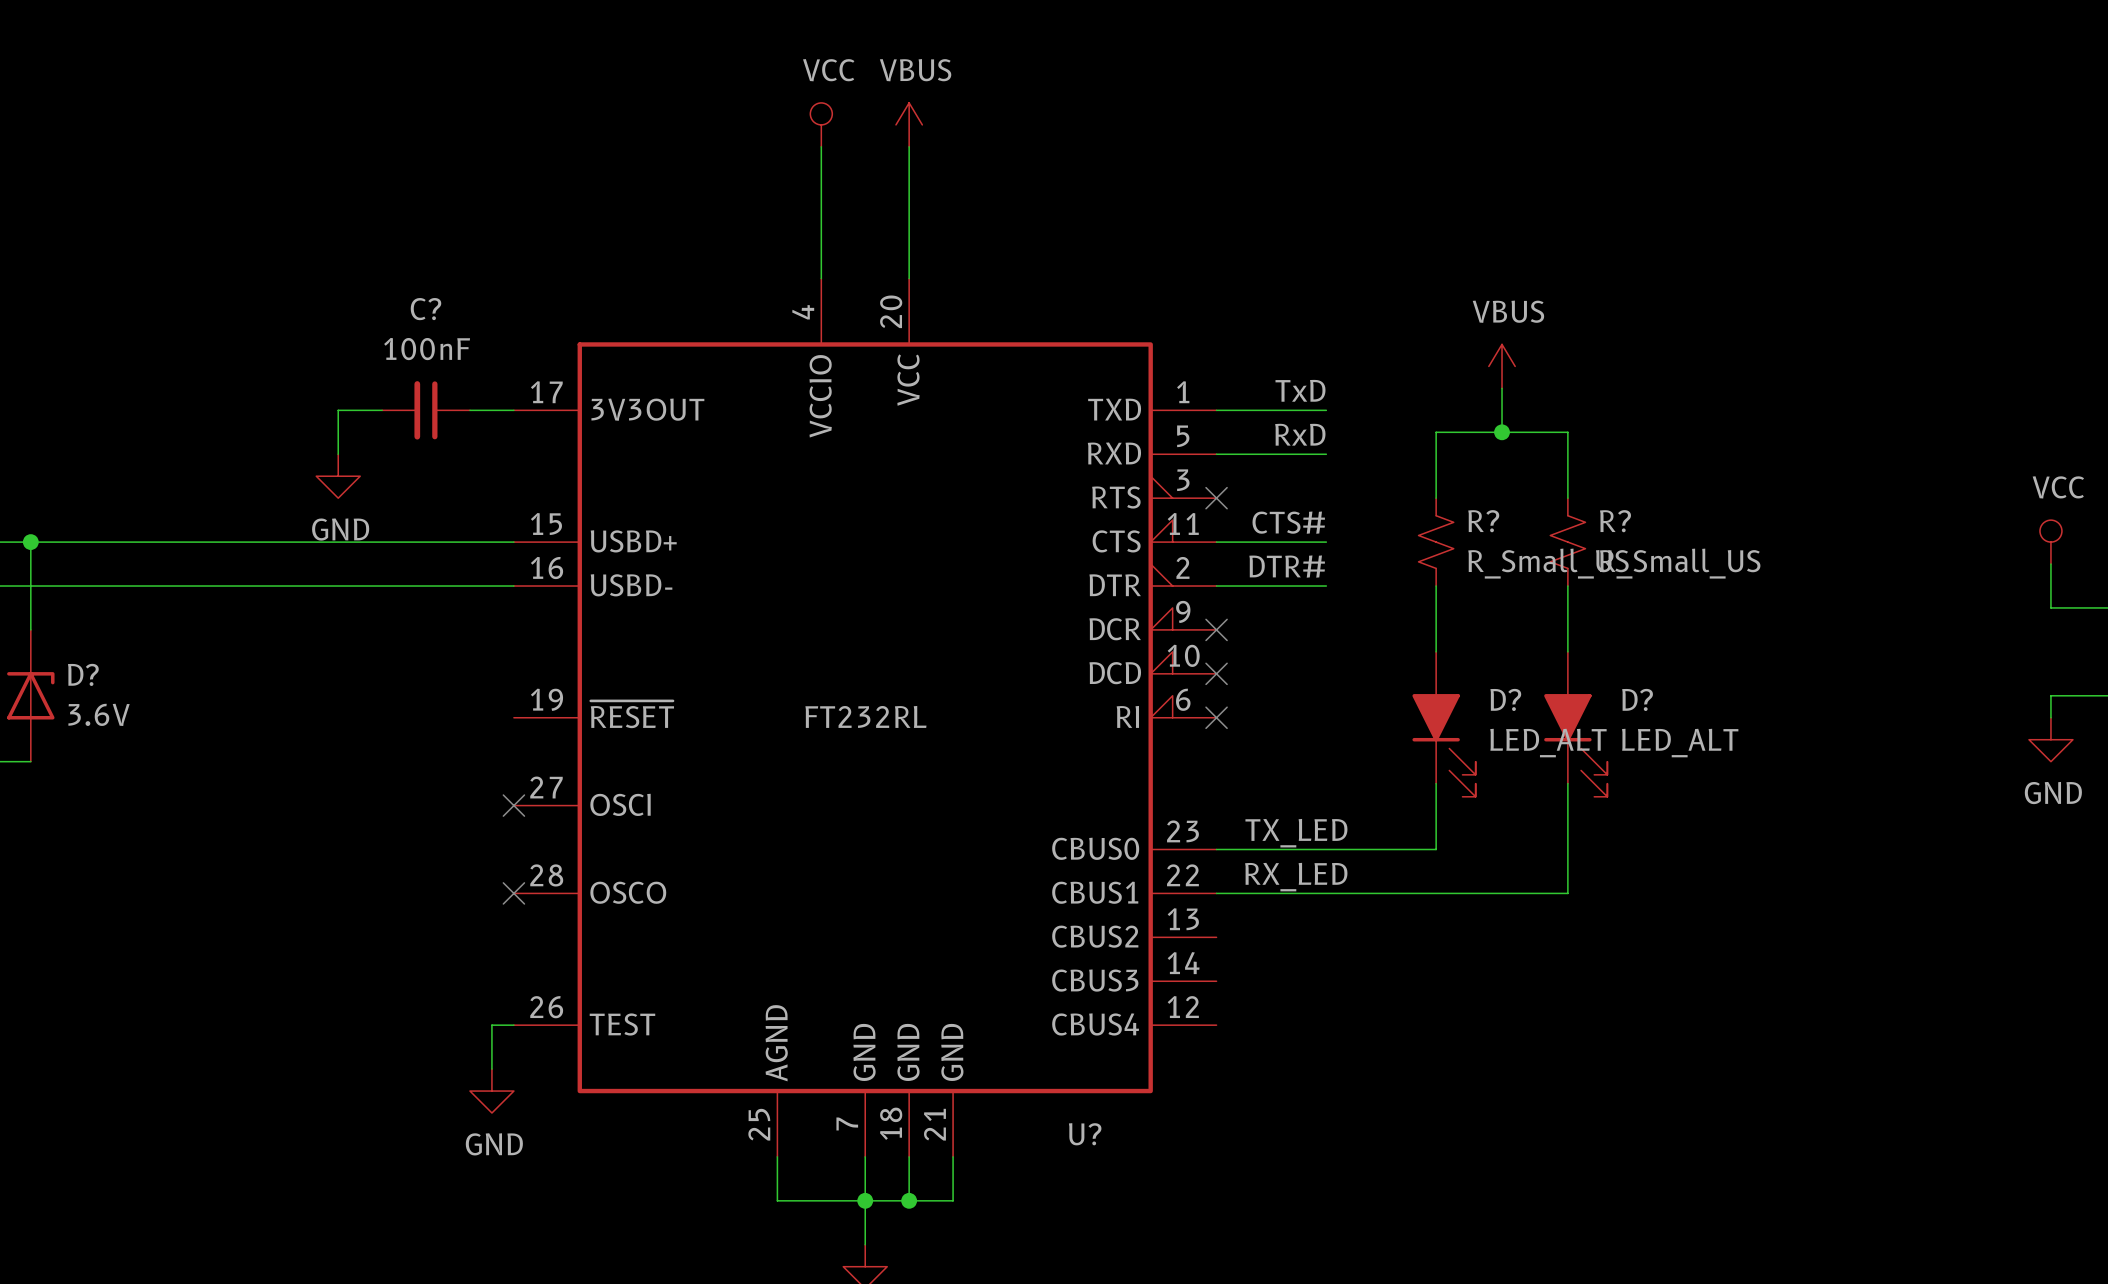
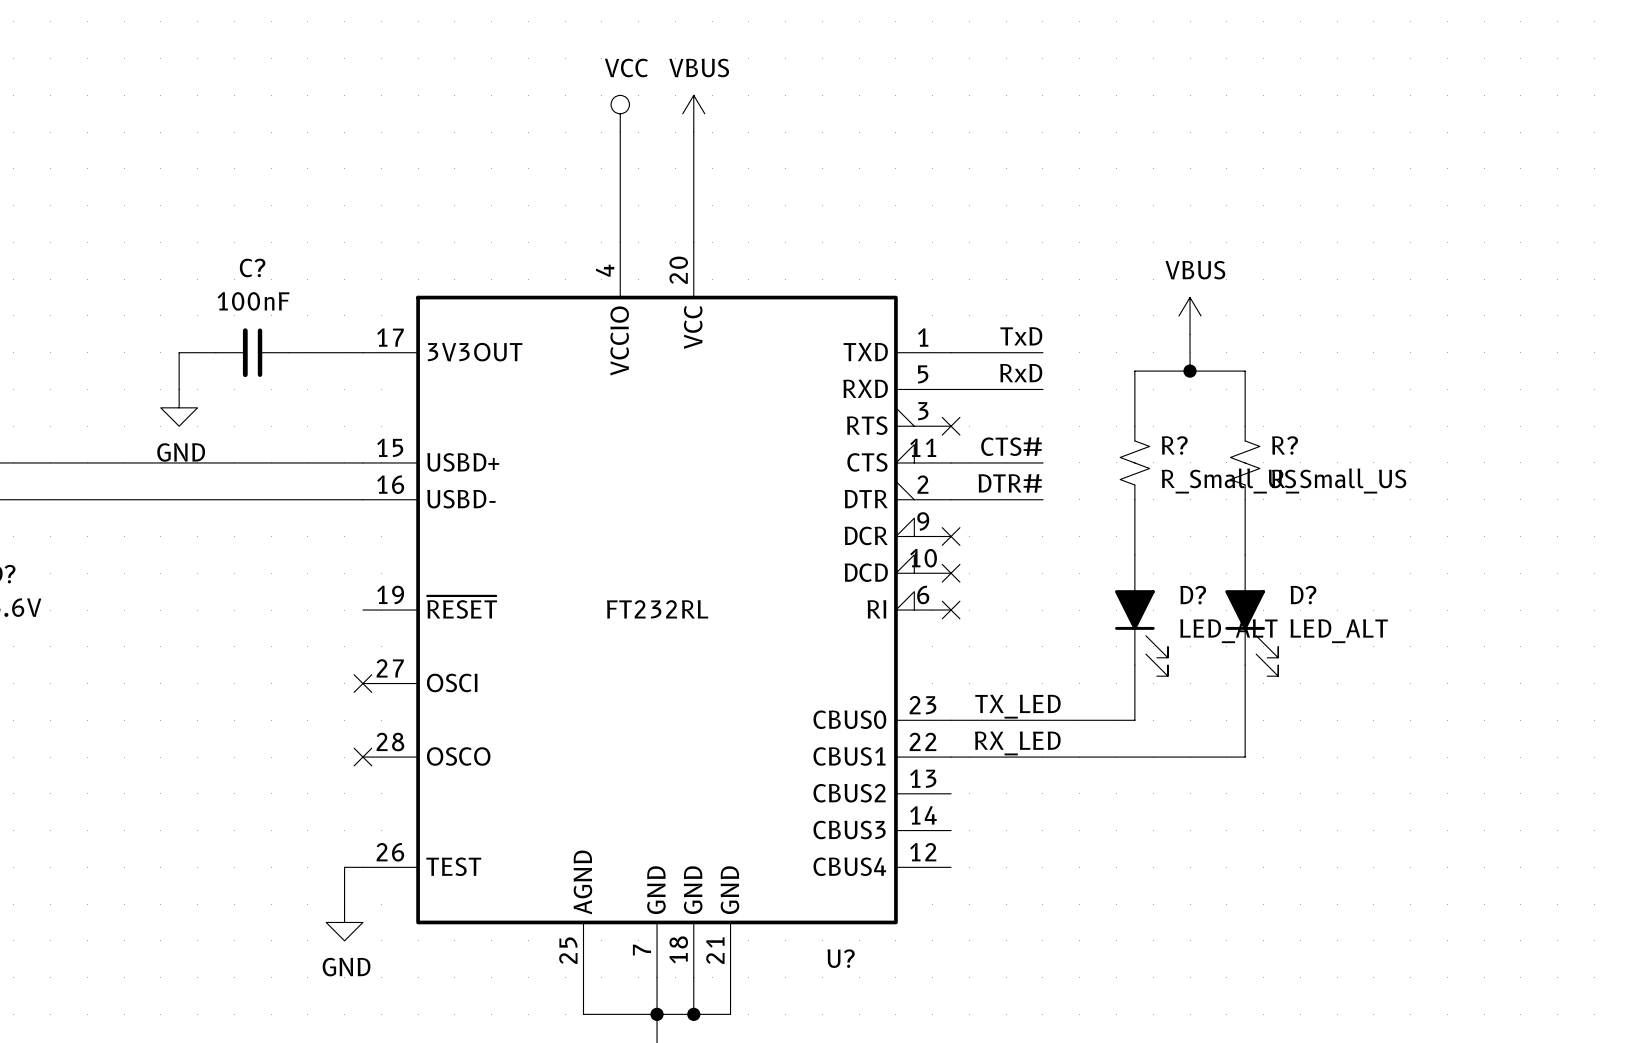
wire: (382, 410) (338, 410) (338, 454) -> (215, 352) (179, 352) (179, 389)
C? position: (426, 410) -> (252, 352)
power symbol position: GND (338, 476) -> GND (179, 407)

